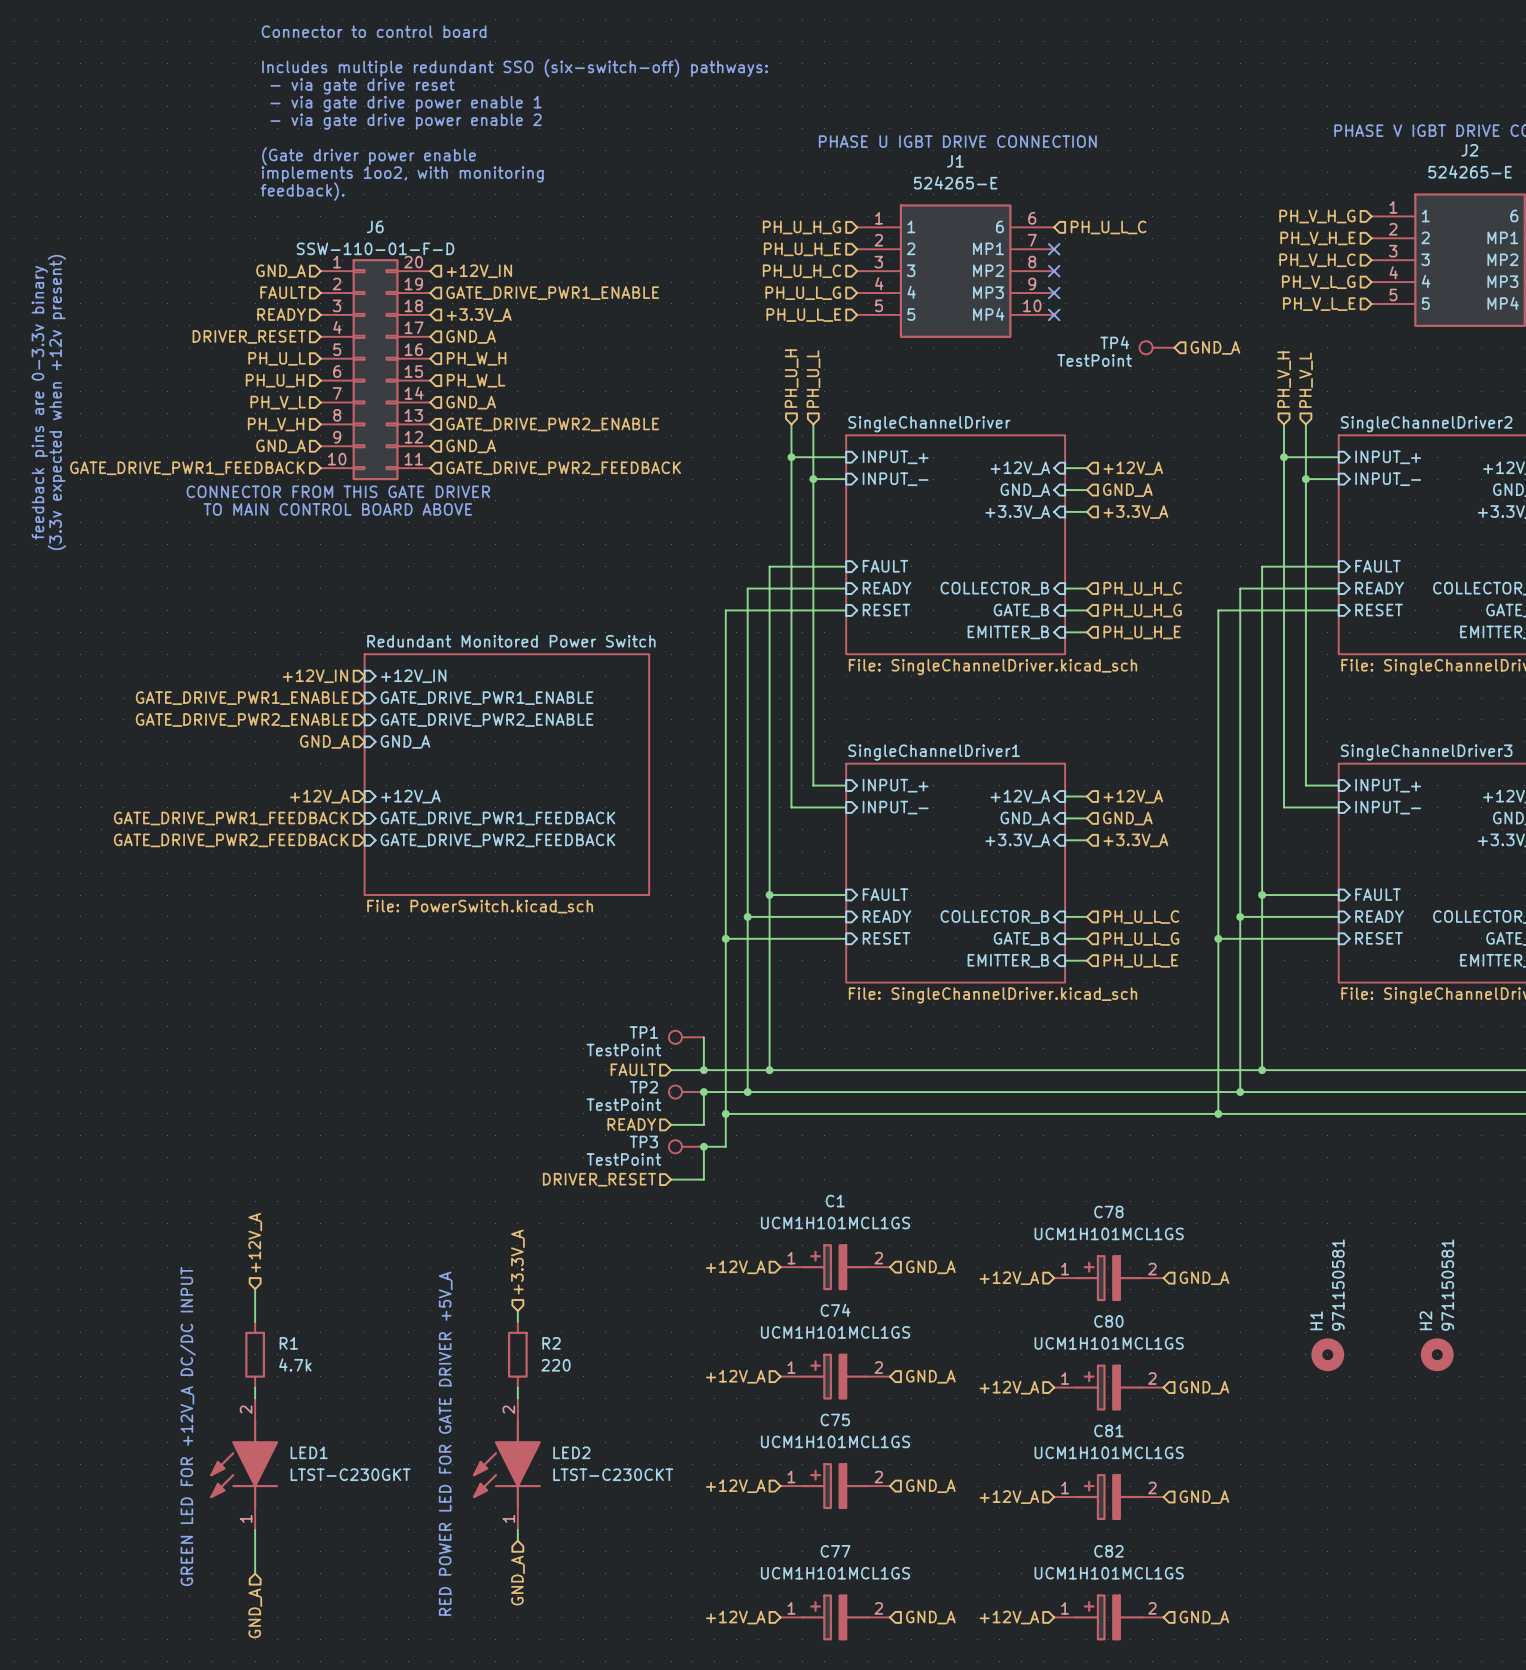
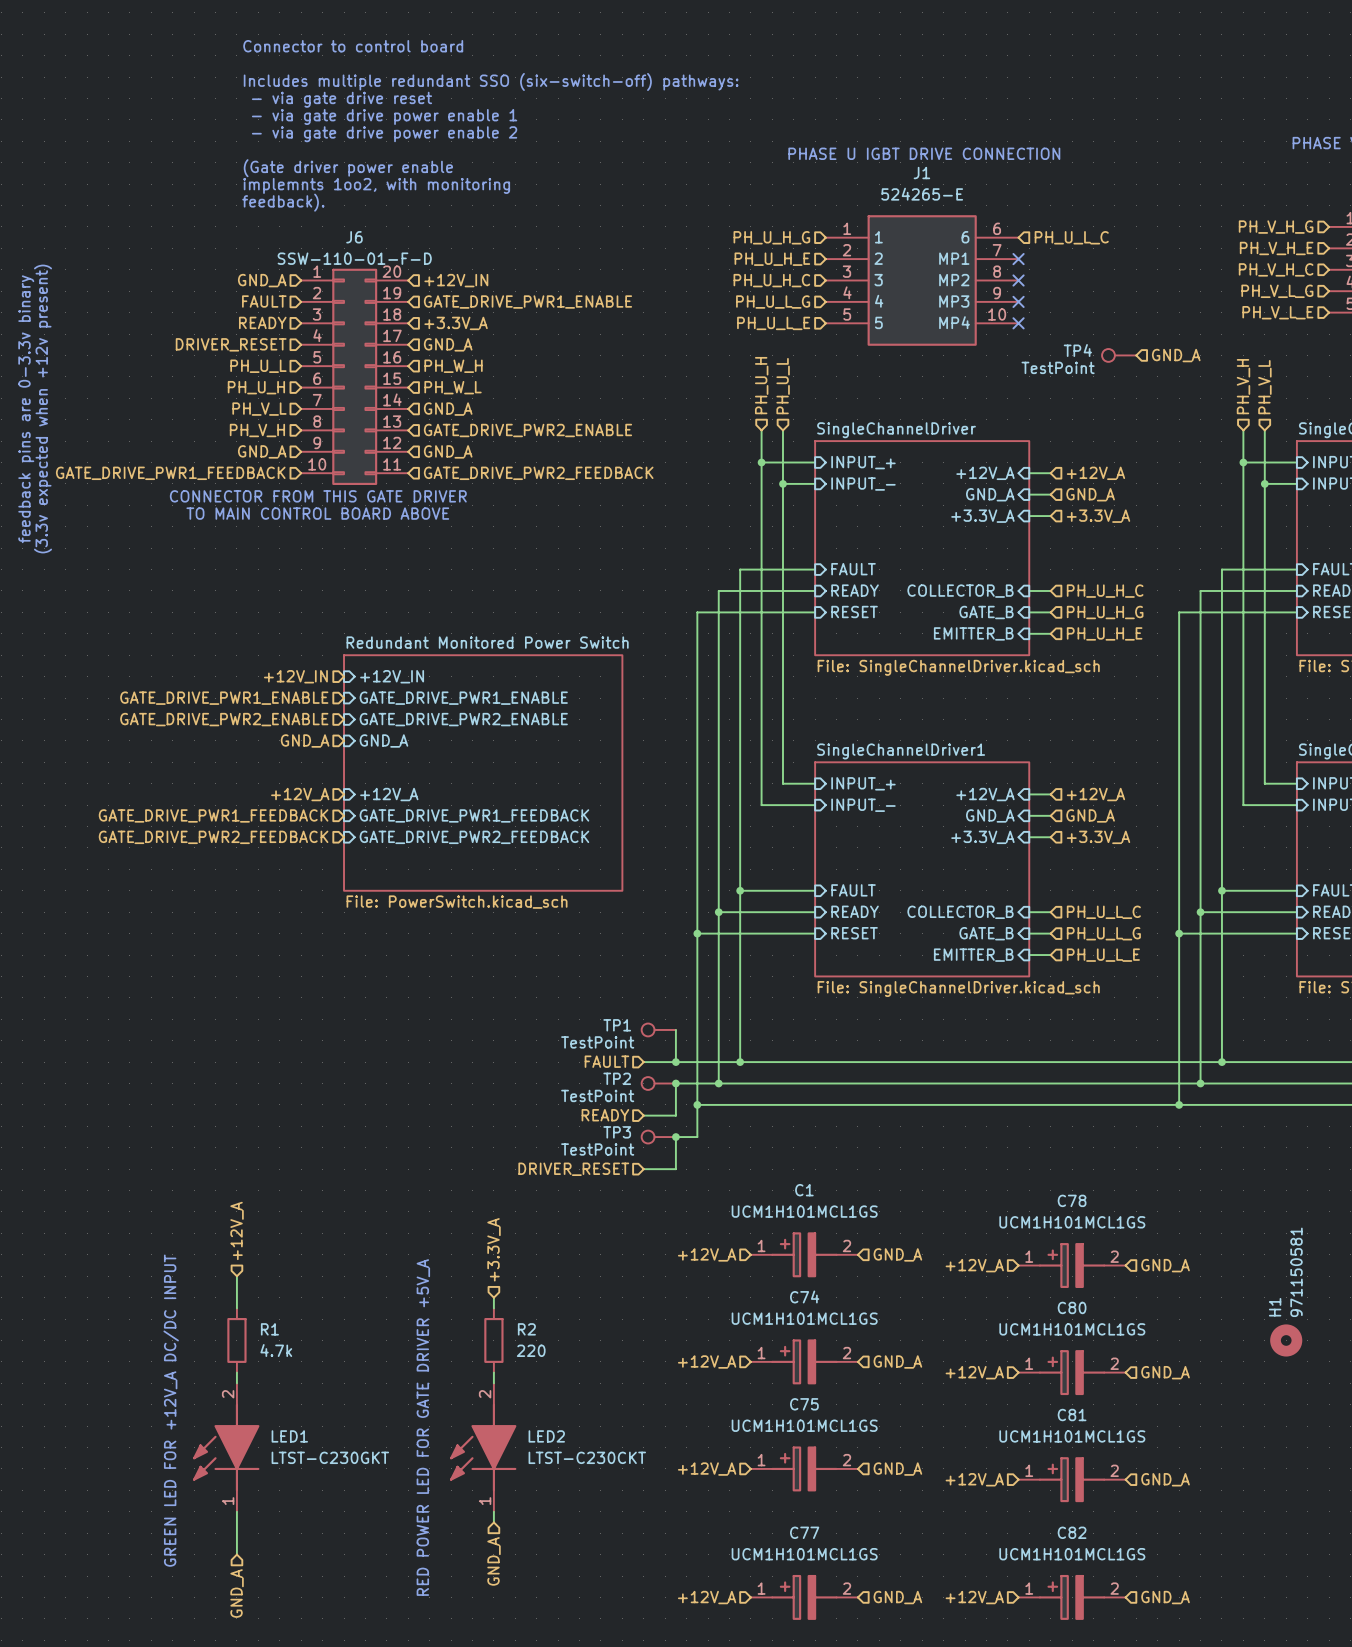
text: implements 1oo2, with monitoring (402, 174) -> implemnts 1oo2, with monitoring (376, 185)

